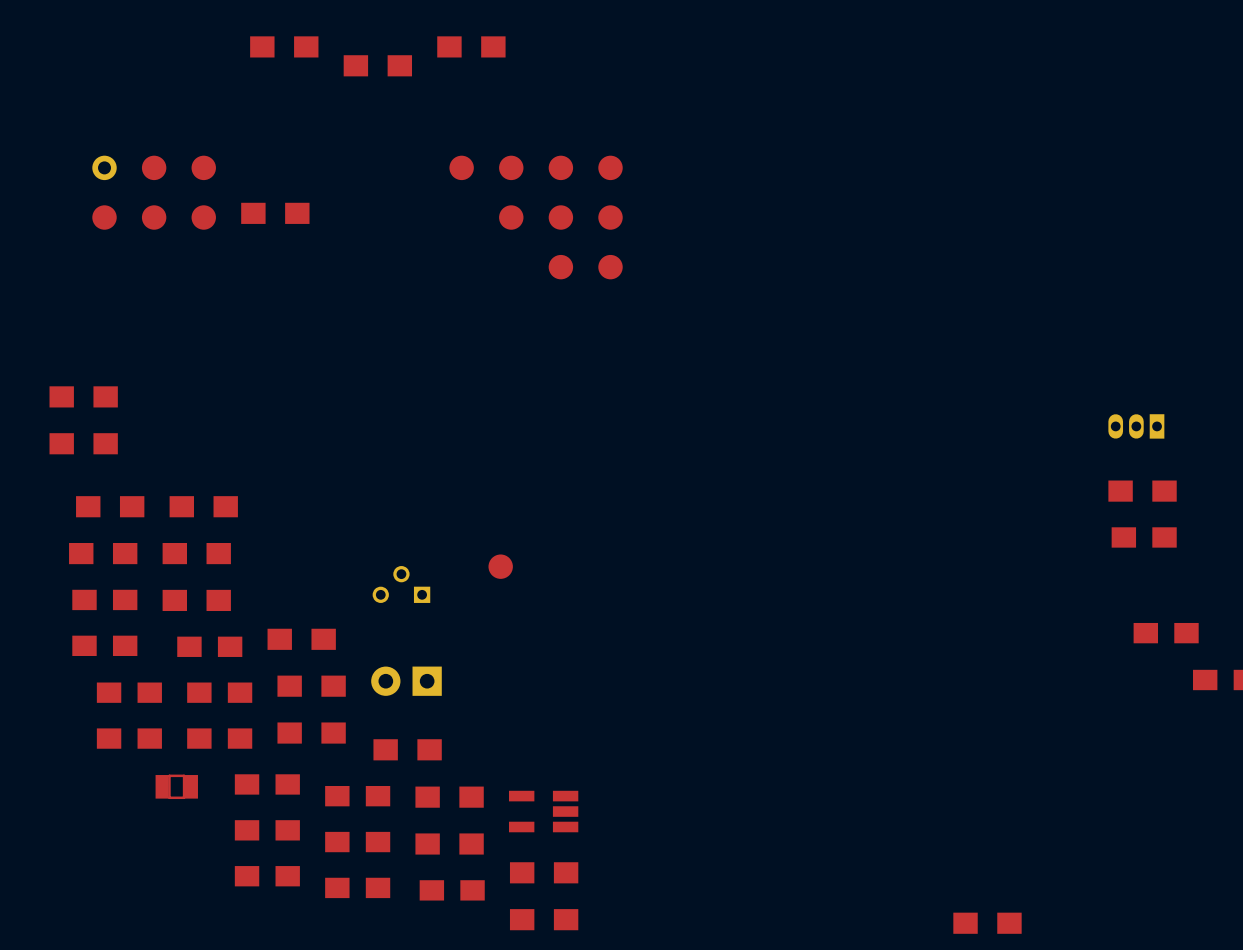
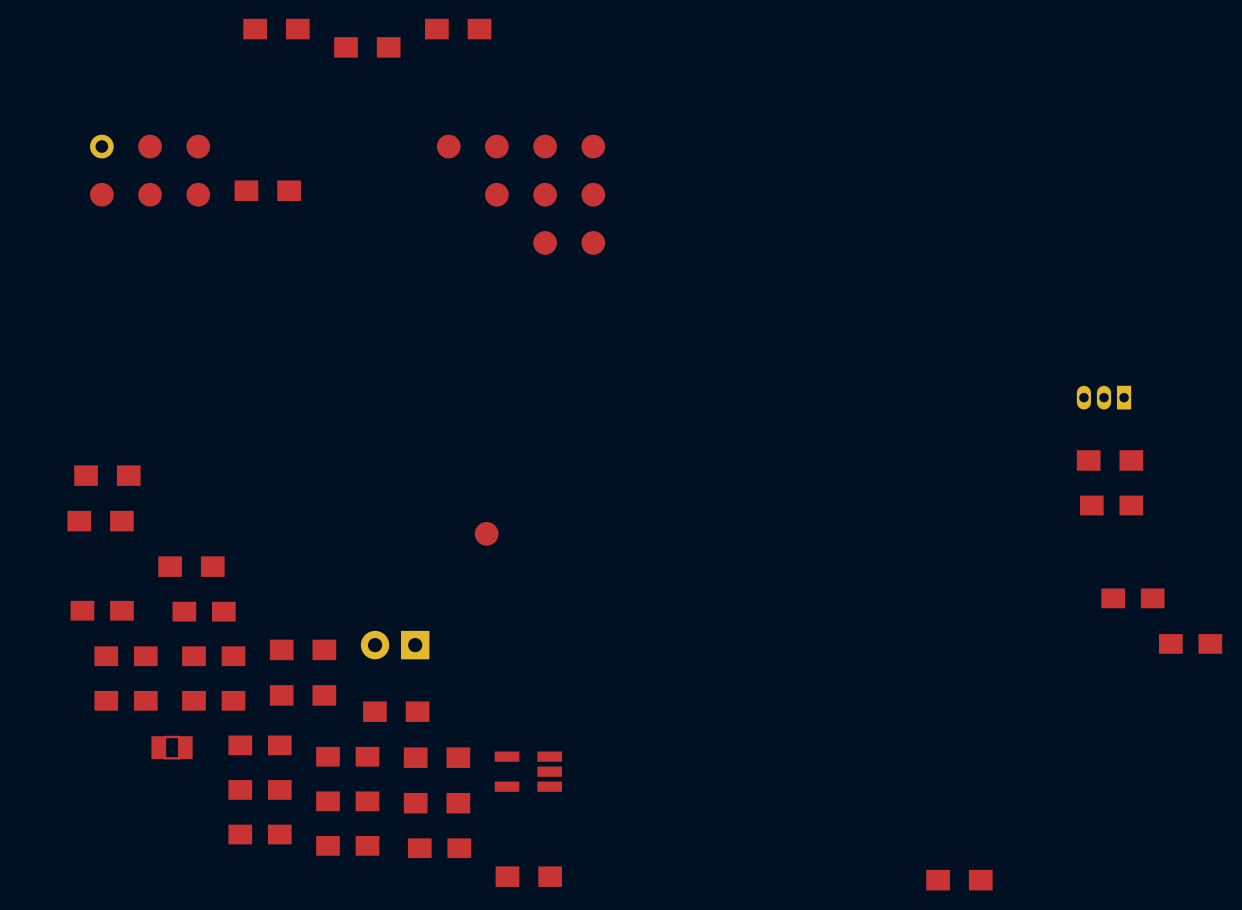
part: (83, 396) -> none
part: (83, 443) -> none
part: (203, 506) -> none
part: (196, 553) -> none
part: (401, 584) -> none
part: (104, 599) -> none
part: (301, 639) -> none
part: (544, 872) -> none

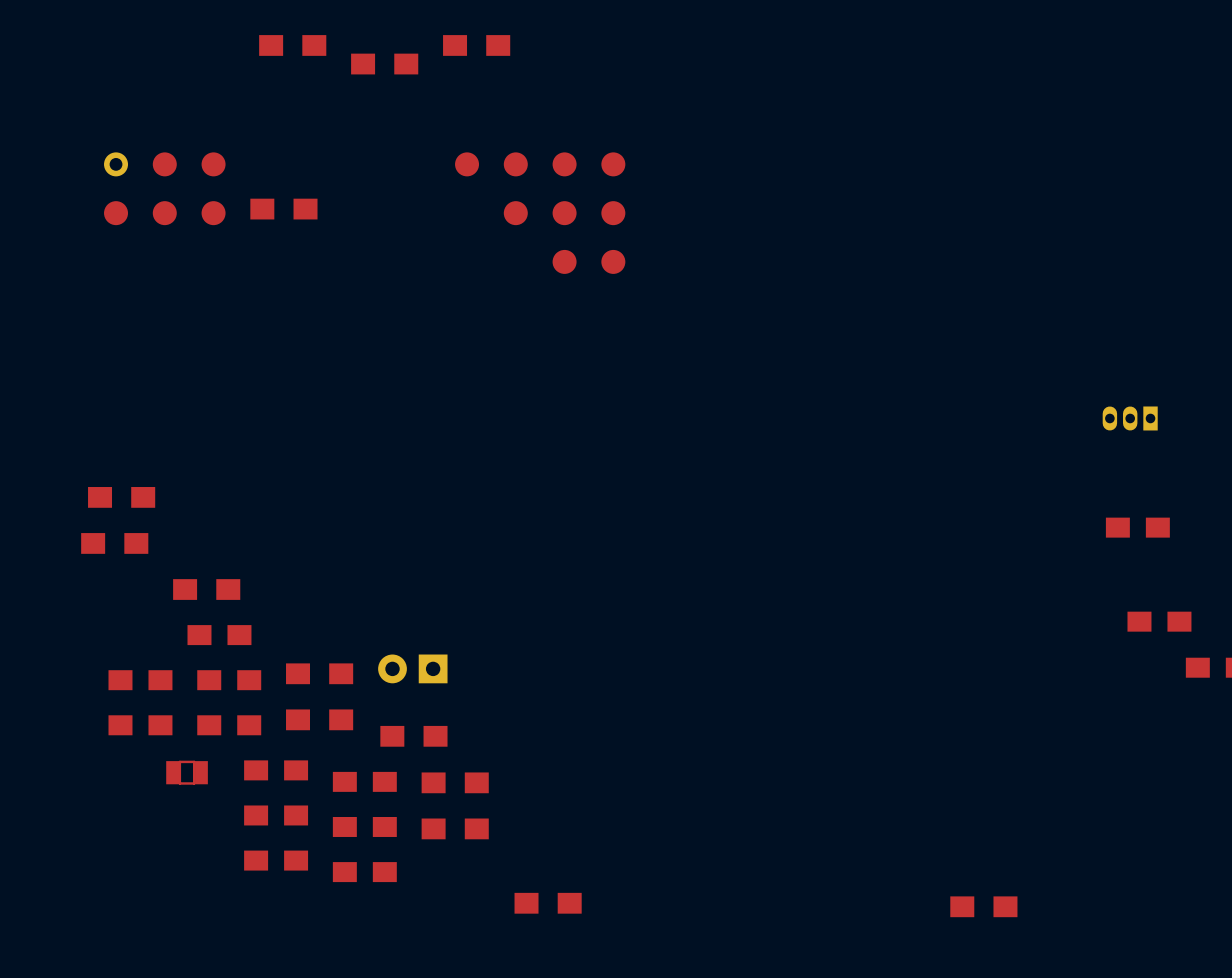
part: (1110, 460) -> none
part: (486, 533) -> none
part: (102, 610) -> none
part: (528, 771) -> none
part: (439, 848) -> none

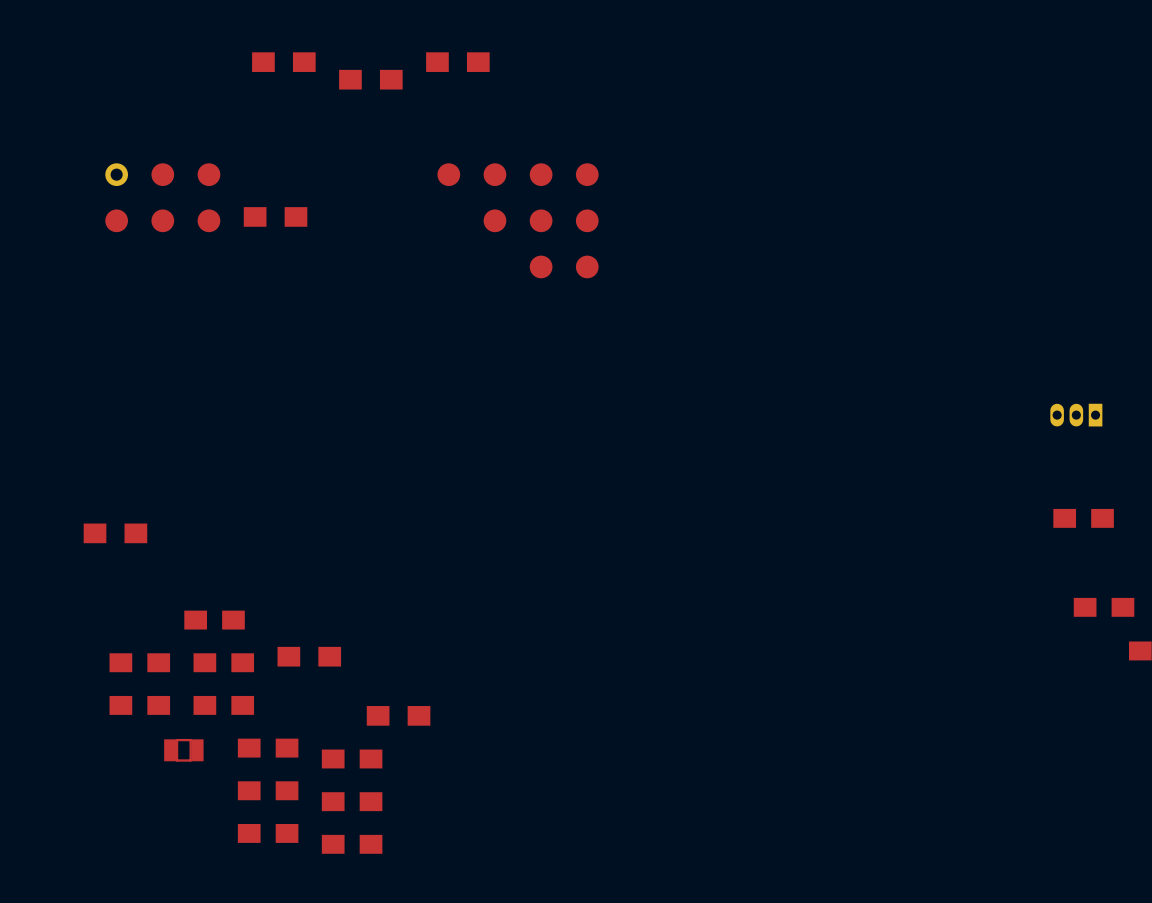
part: (121, 497) -> none
part: (206, 589) -> none
part: (412, 668) -> none
part: (319, 719) -> none
part: (455, 782) -> none
part: (455, 828) -> none
part: (548, 903) -> none
part: (983, 906) -> none

